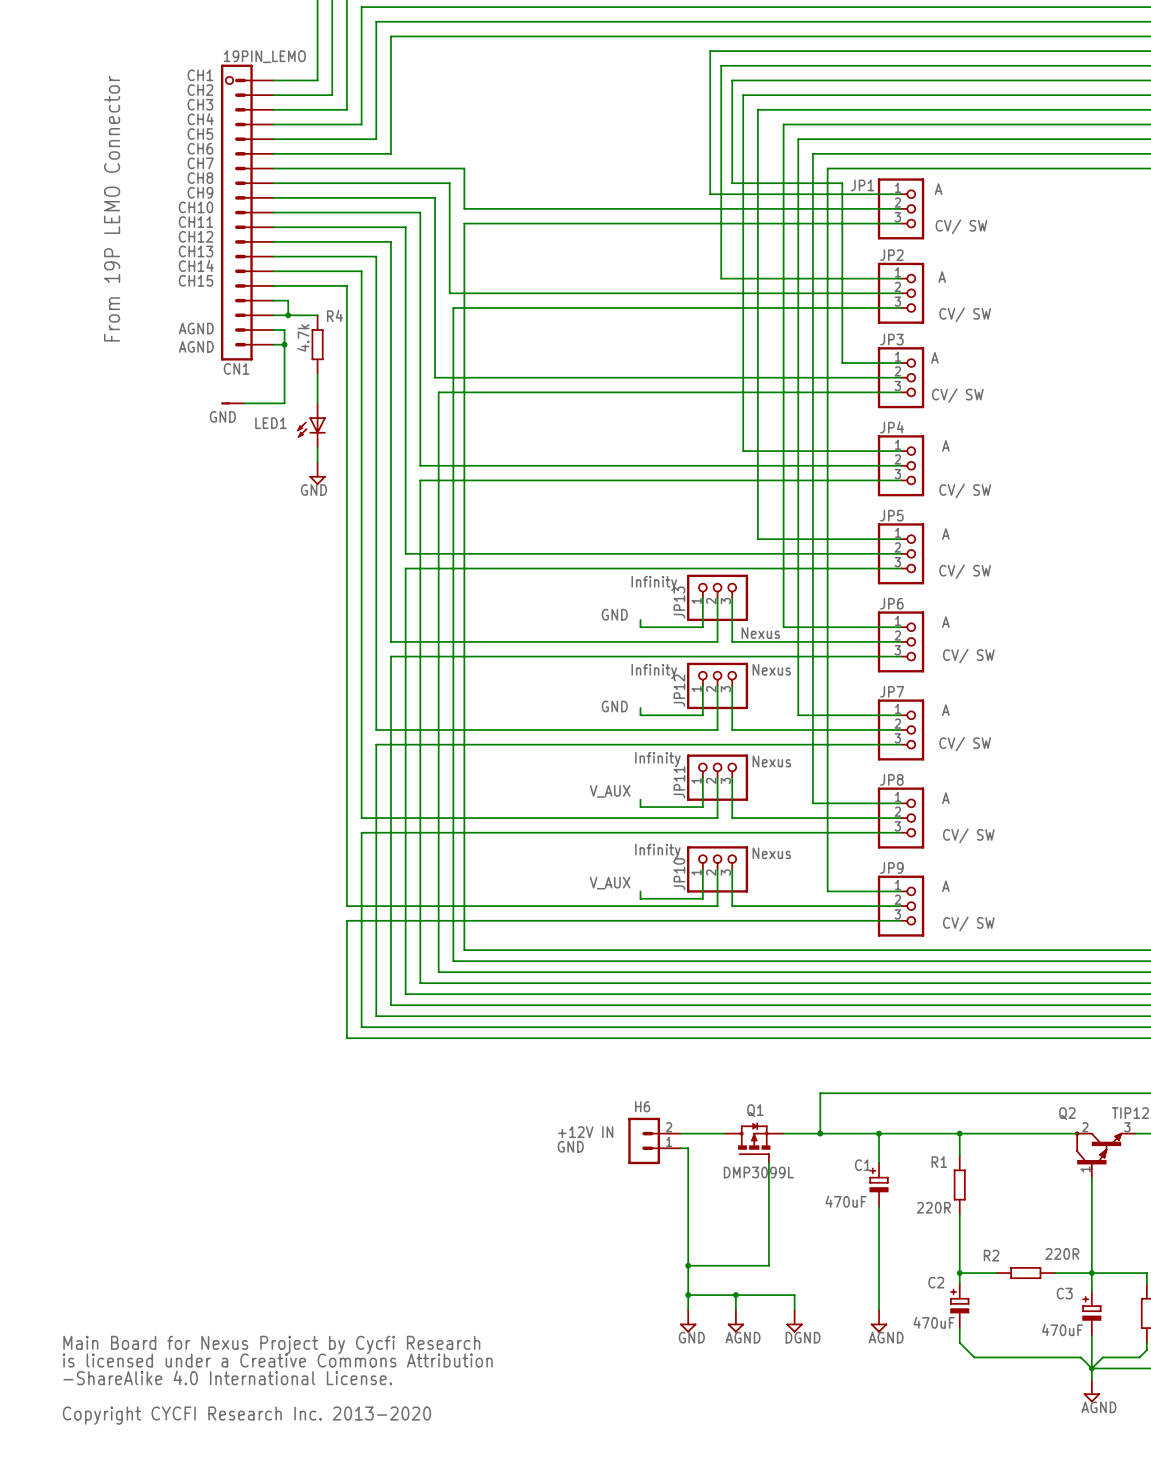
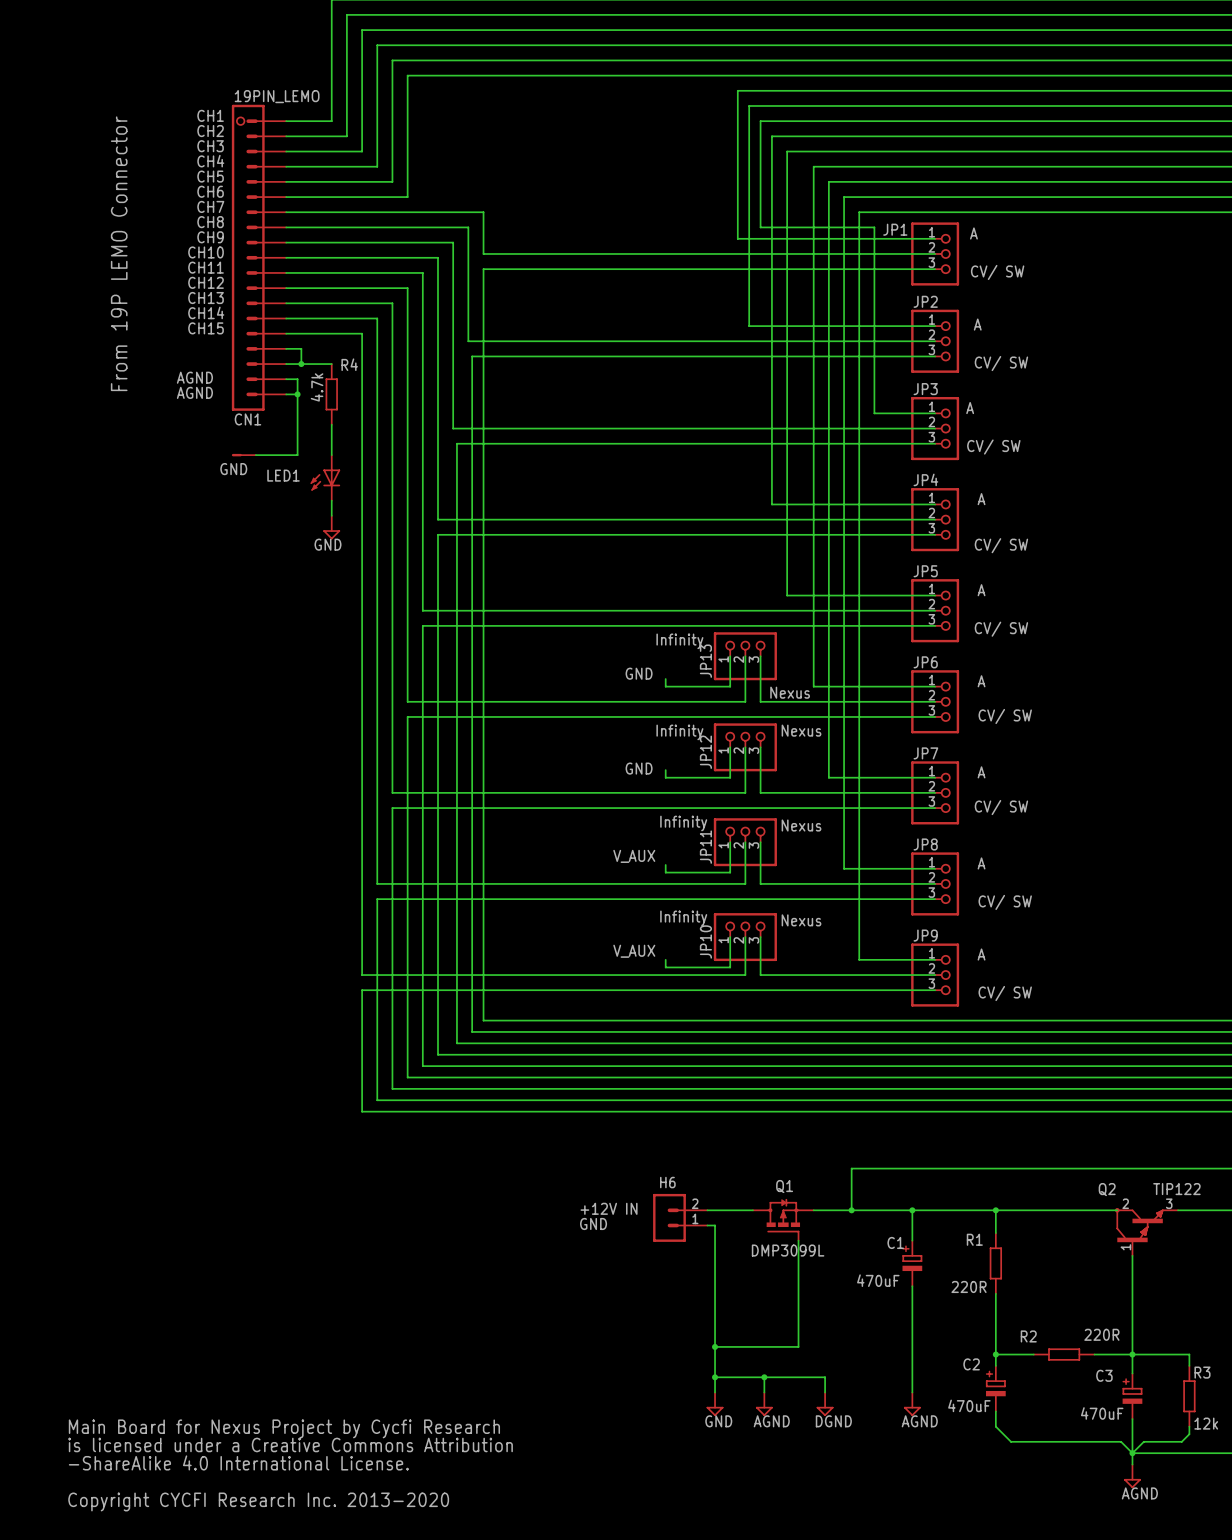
text: none -> AGND (194, 377)
text: AGND (196, 328) -> none
text: none -> AGND (194, 392)
text: AGND (196, 346) -> none

